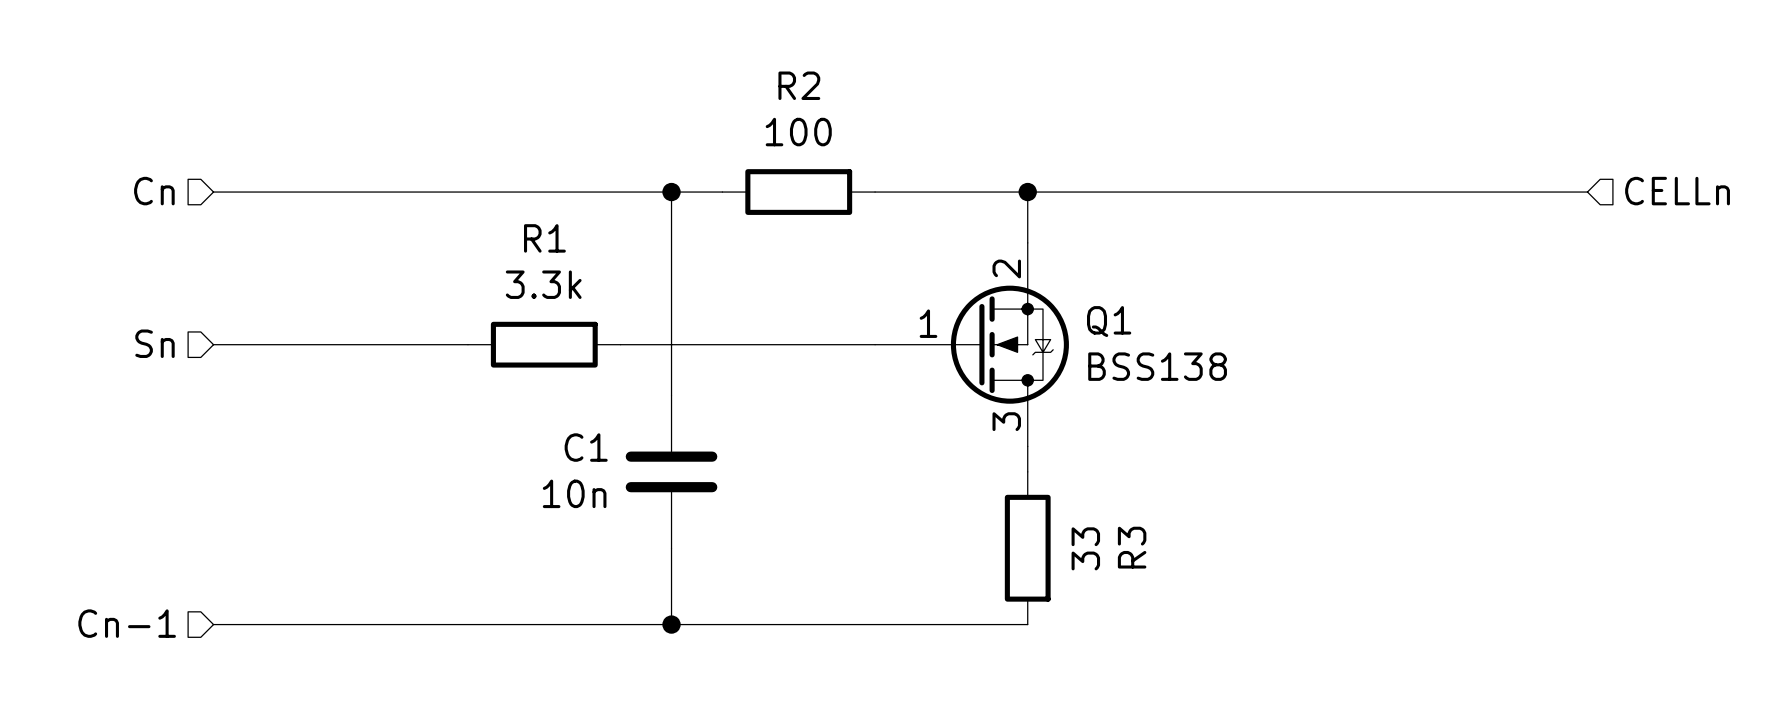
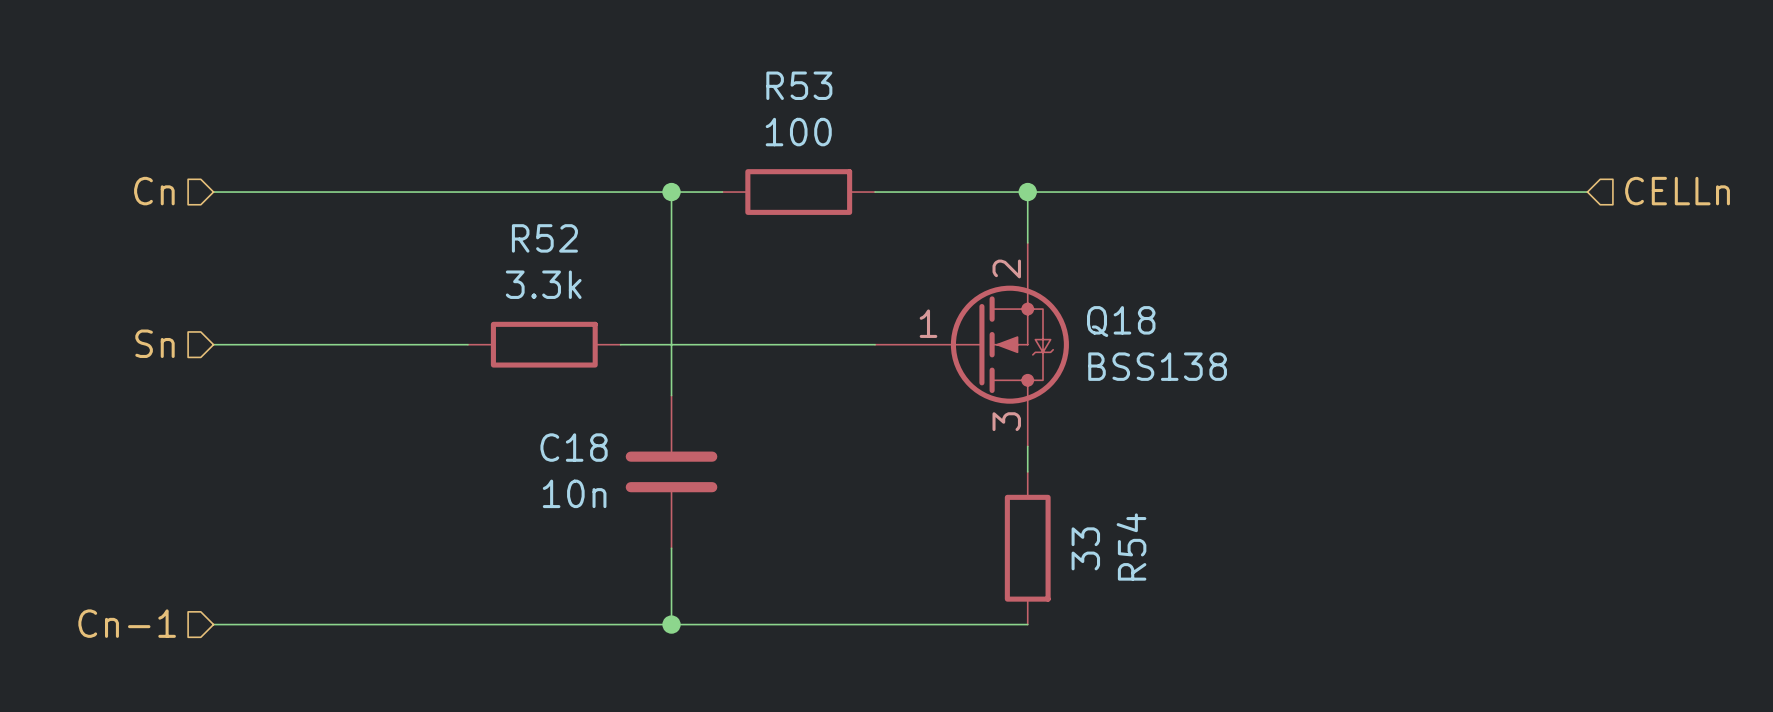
R2 name: R2 (799, 85) -> R53 (799, 85)
R1 name: R1 (544, 238) -> R52 (544, 238)
Q1 name: Q1 (1109, 321) -> Q18 (1121, 321)
C1 name: C1 (586, 447) -> C18 (574, 447)
R3 name: R3 (1132, 547) -> R54 (1131, 547)

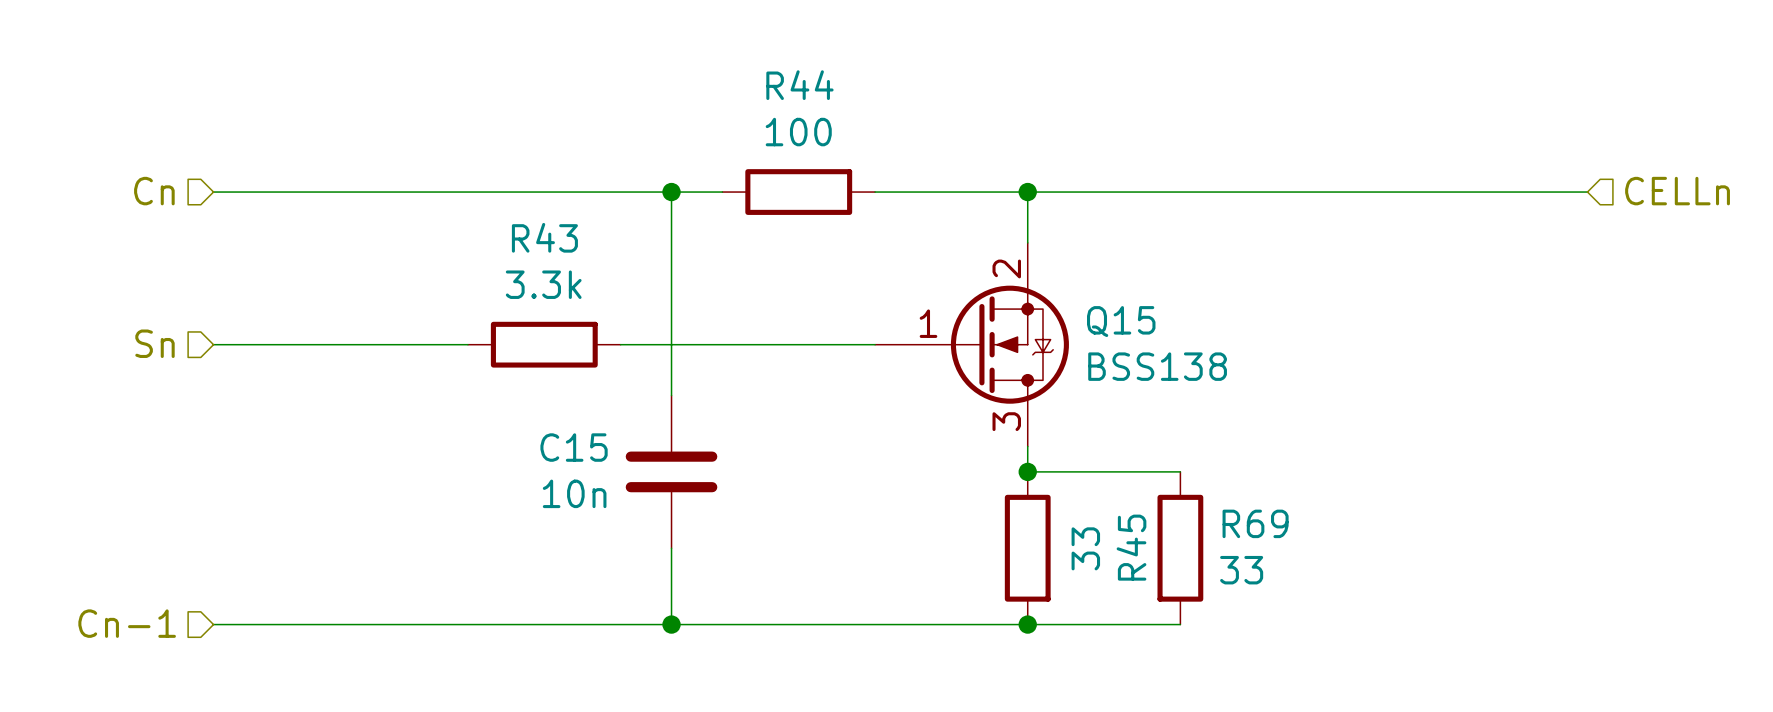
R53 name: R53 (799, 85) -> R44 (799, 85)
R52 name: R52 (544, 238) -> R43 (544, 237)
Q18 name: Q18 (1121, 321) -> Q15 (1121, 321)
C18 name: C18 (574, 447) -> C15 (574, 447)
wire: none -> (1027, 471) (1180, 471)
junction: none -> (1027, 471)
R54 name: R54 (1131, 547) -> R45 (1131, 547)
R69: none -> 33 (1180, 548)
wire: none -> (1027, 624) (1180, 624)
junction: none -> (1027, 624)

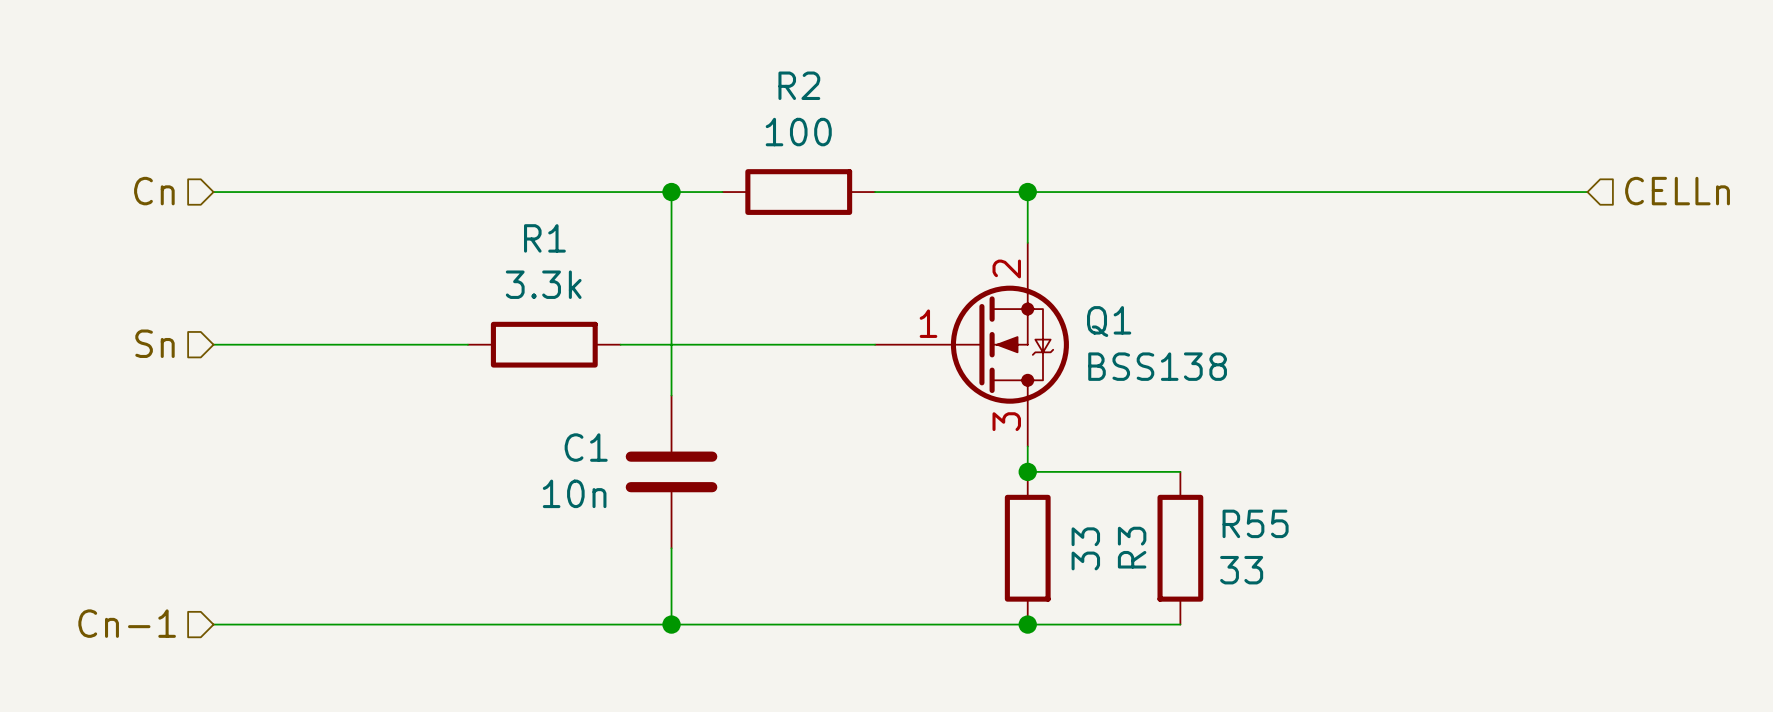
R44 name: R44 (799, 85) -> R2 (799, 85)
R43 name: R43 (544, 237) -> R1 (544, 238)
Q15 name: Q15 (1121, 321) -> Q1 (1109, 321)
C15 name: C15 (574, 447) -> C1 (586, 447)
R69 name: R69 (1255, 523) -> R55 (1255, 523)
R45 name: R45 (1131, 547) -> R3 (1132, 547)

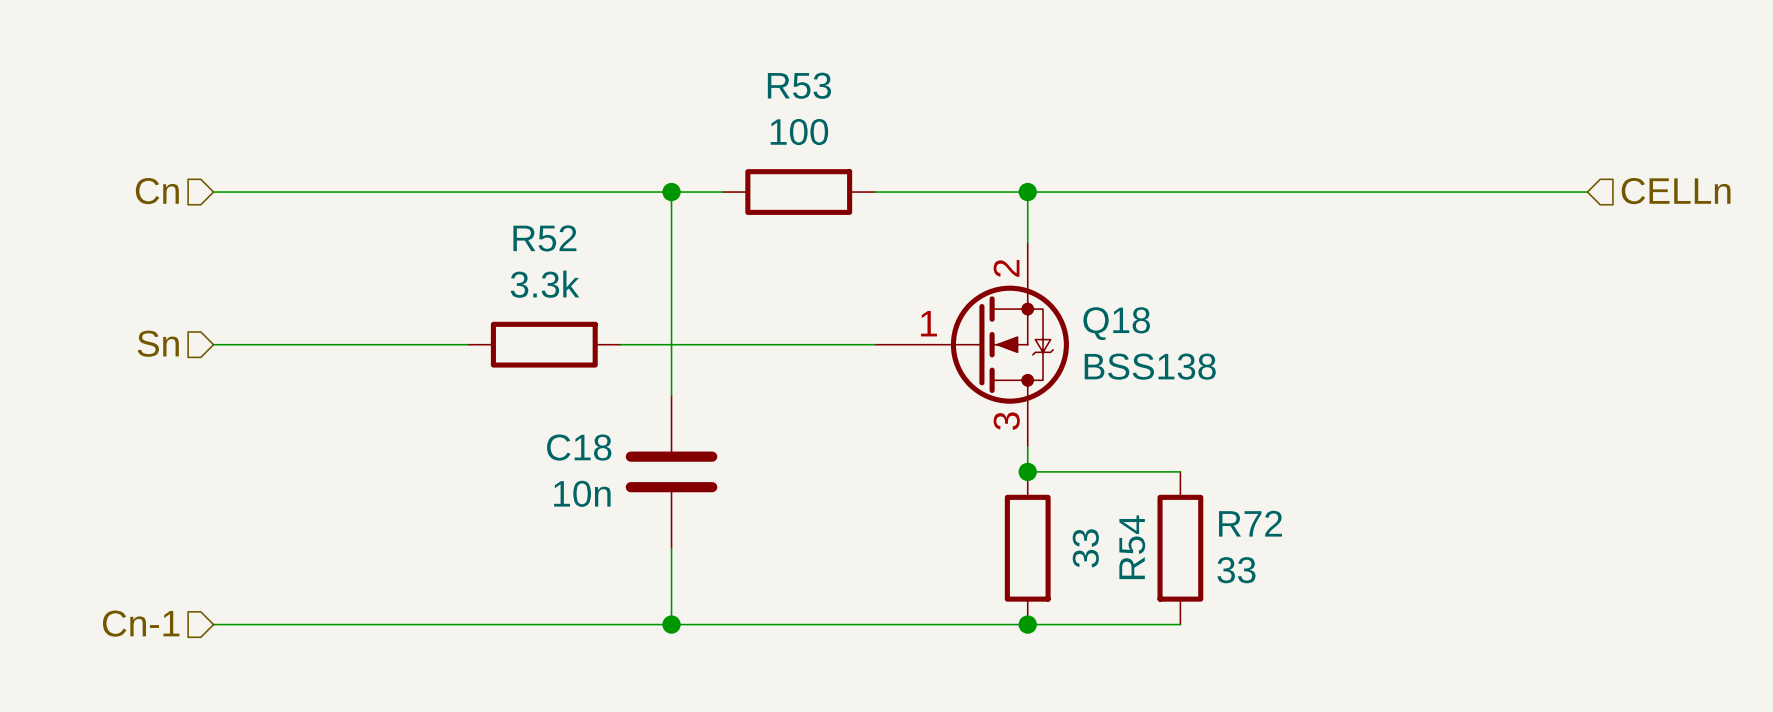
R2 name: R2 (799, 85) -> R53 (799, 85)
R1 name: R1 (544, 238) -> R52 (544, 238)
Q1 name: Q1 (1109, 321) -> Q18 (1116, 323)
C1 name: C1 (586, 447) -> C18 (579, 447)
R55 name: R55 (1255, 523) -> R72 (1250, 523)
R3 name: R3 (1132, 547) -> R54 (1132, 547)

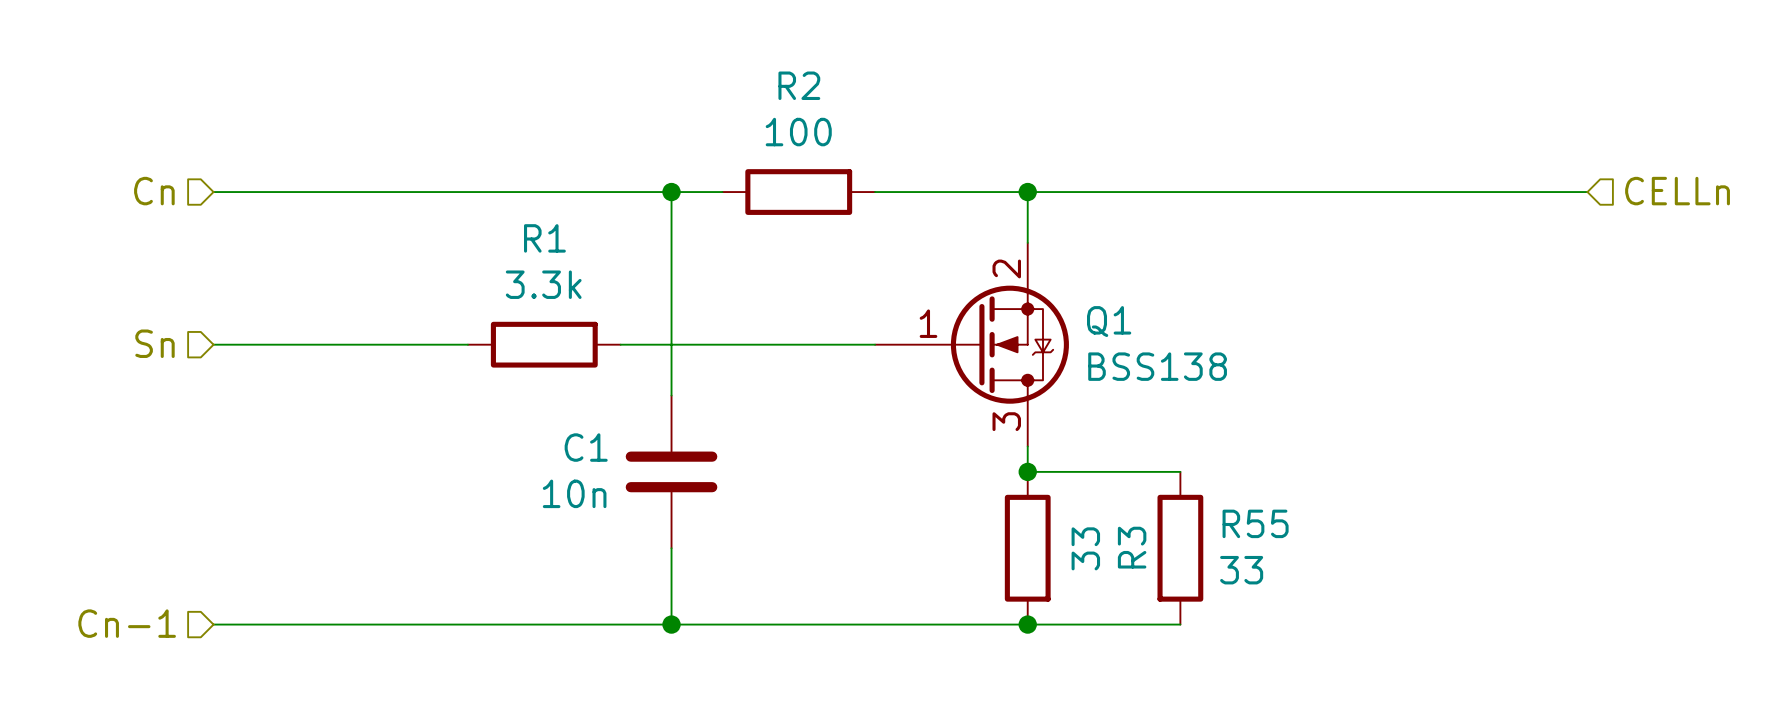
R53 name: R53 (799, 85) -> R2 (799, 85)
R52 name: R52 (544, 238) -> R1 (544, 238)
Q18 name: Q18 (1116, 323) -> Q1 (1109, 321)
C18 name: C18 (579, 447) -> C1 (586, 447)
R72 name: R72 (1250, 523) -> R55 (1255, 523)
R54 name: R54 (1132, 547) -> R3 (1132, 547)

